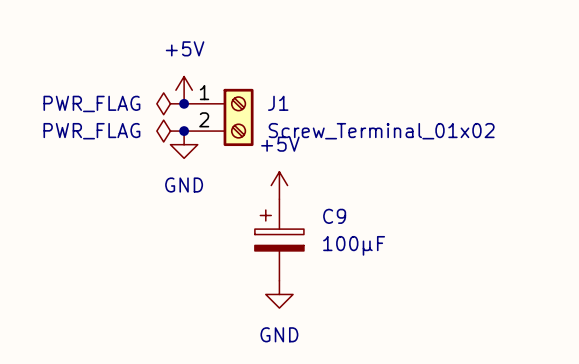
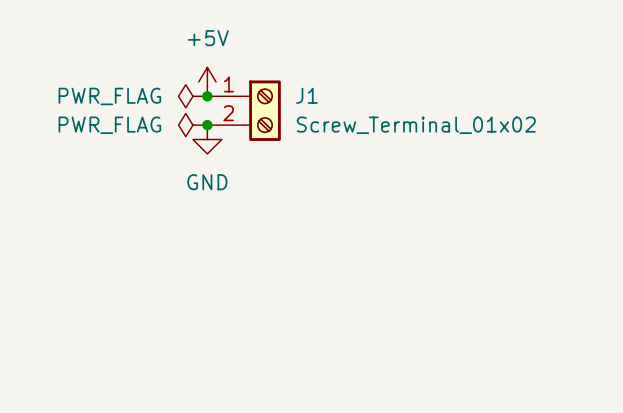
power symbol: +5V (279, 185) -> none
C9: 100µF (279, 239) -> none
power symbol: GND (279, 294) -> none

